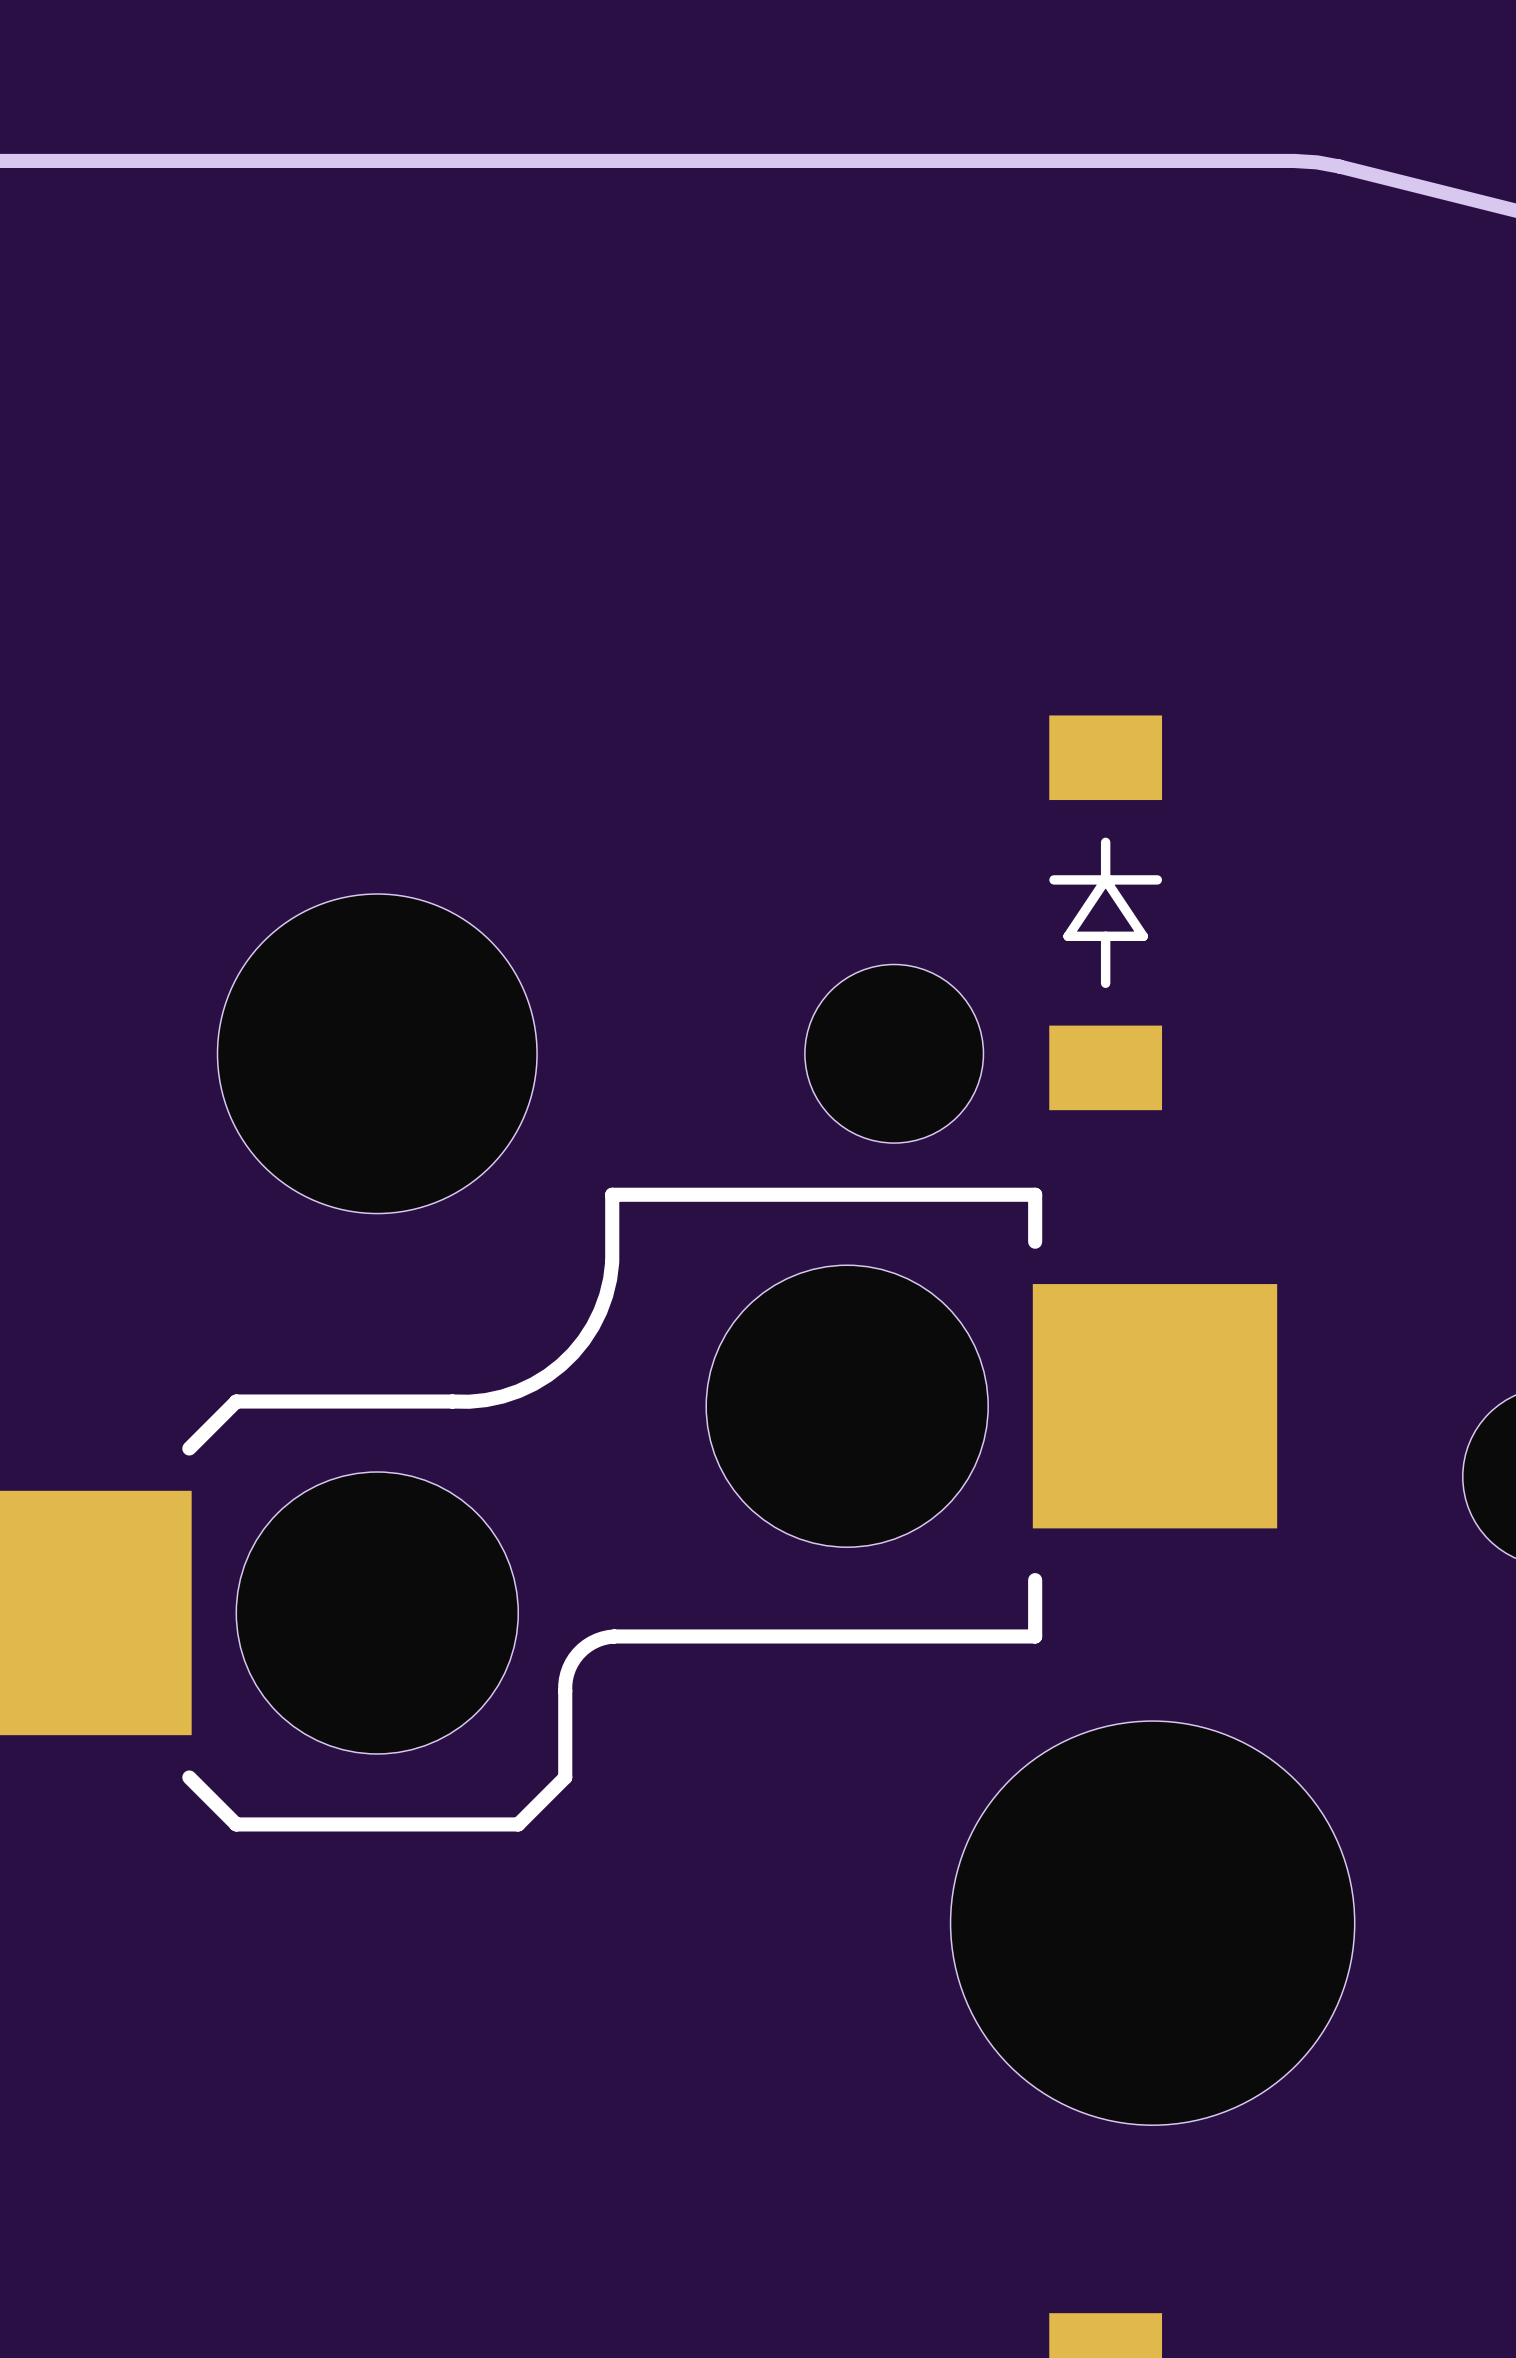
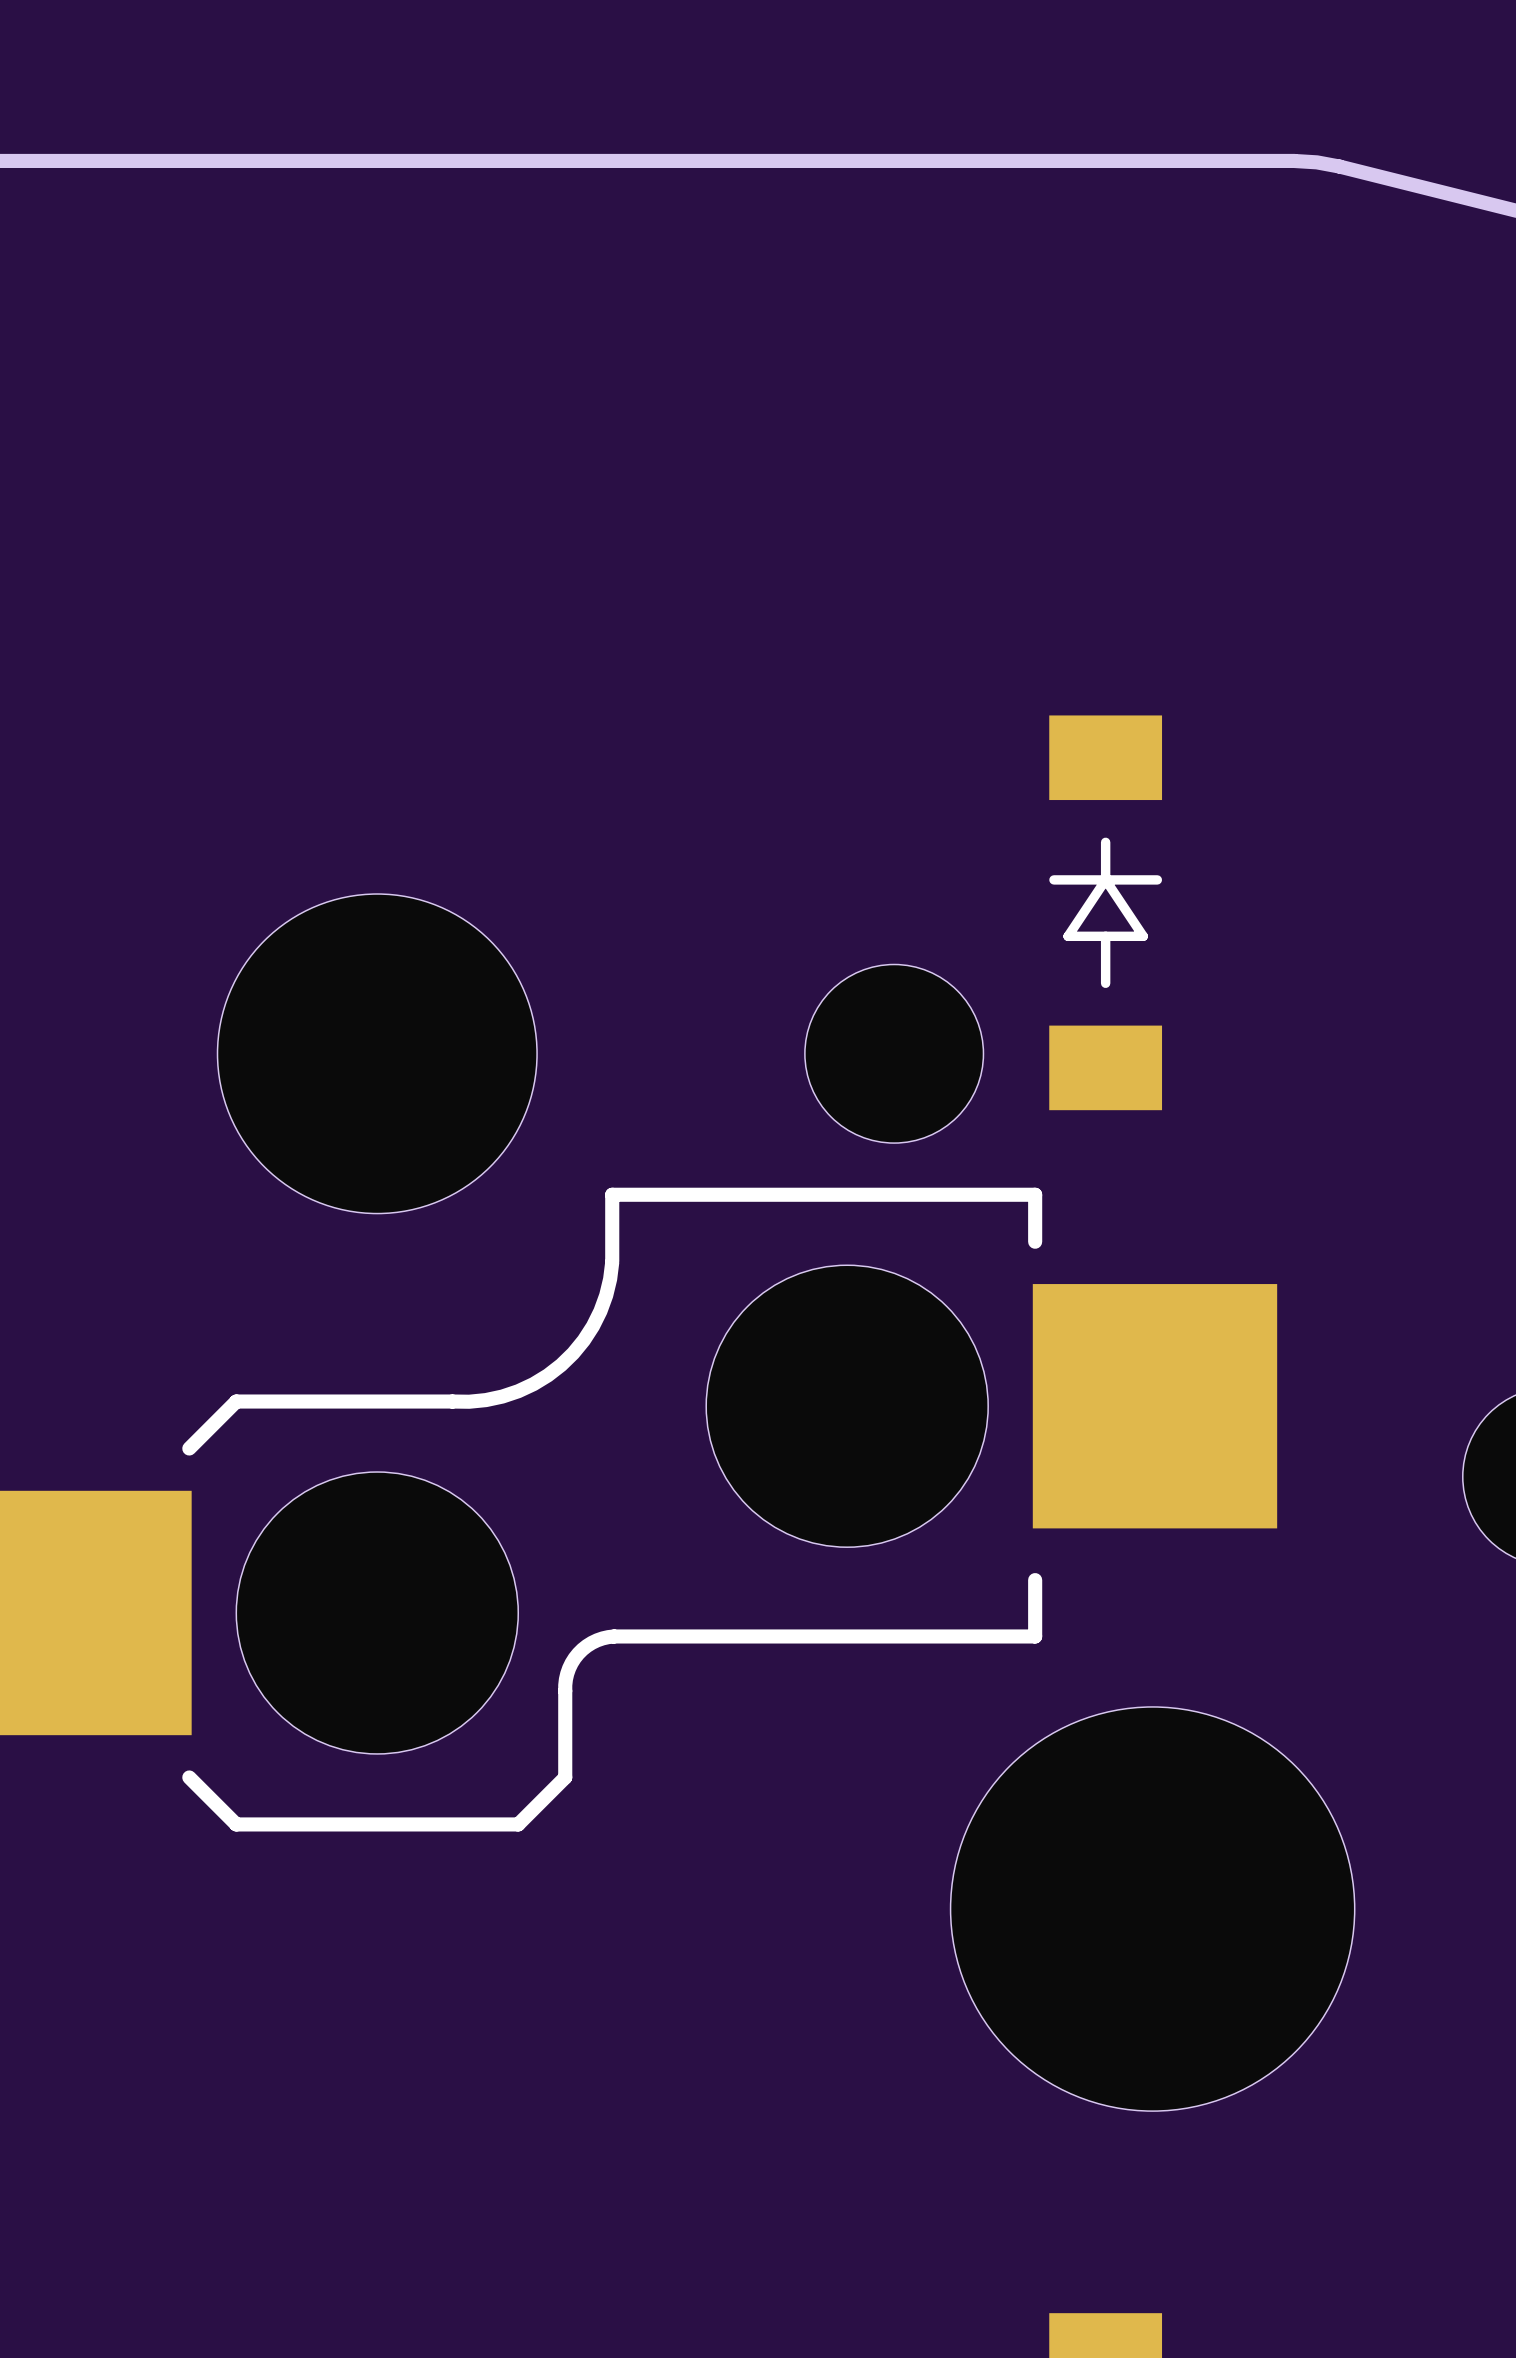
part position: (1152, 1923) -> (1152, 1909)

